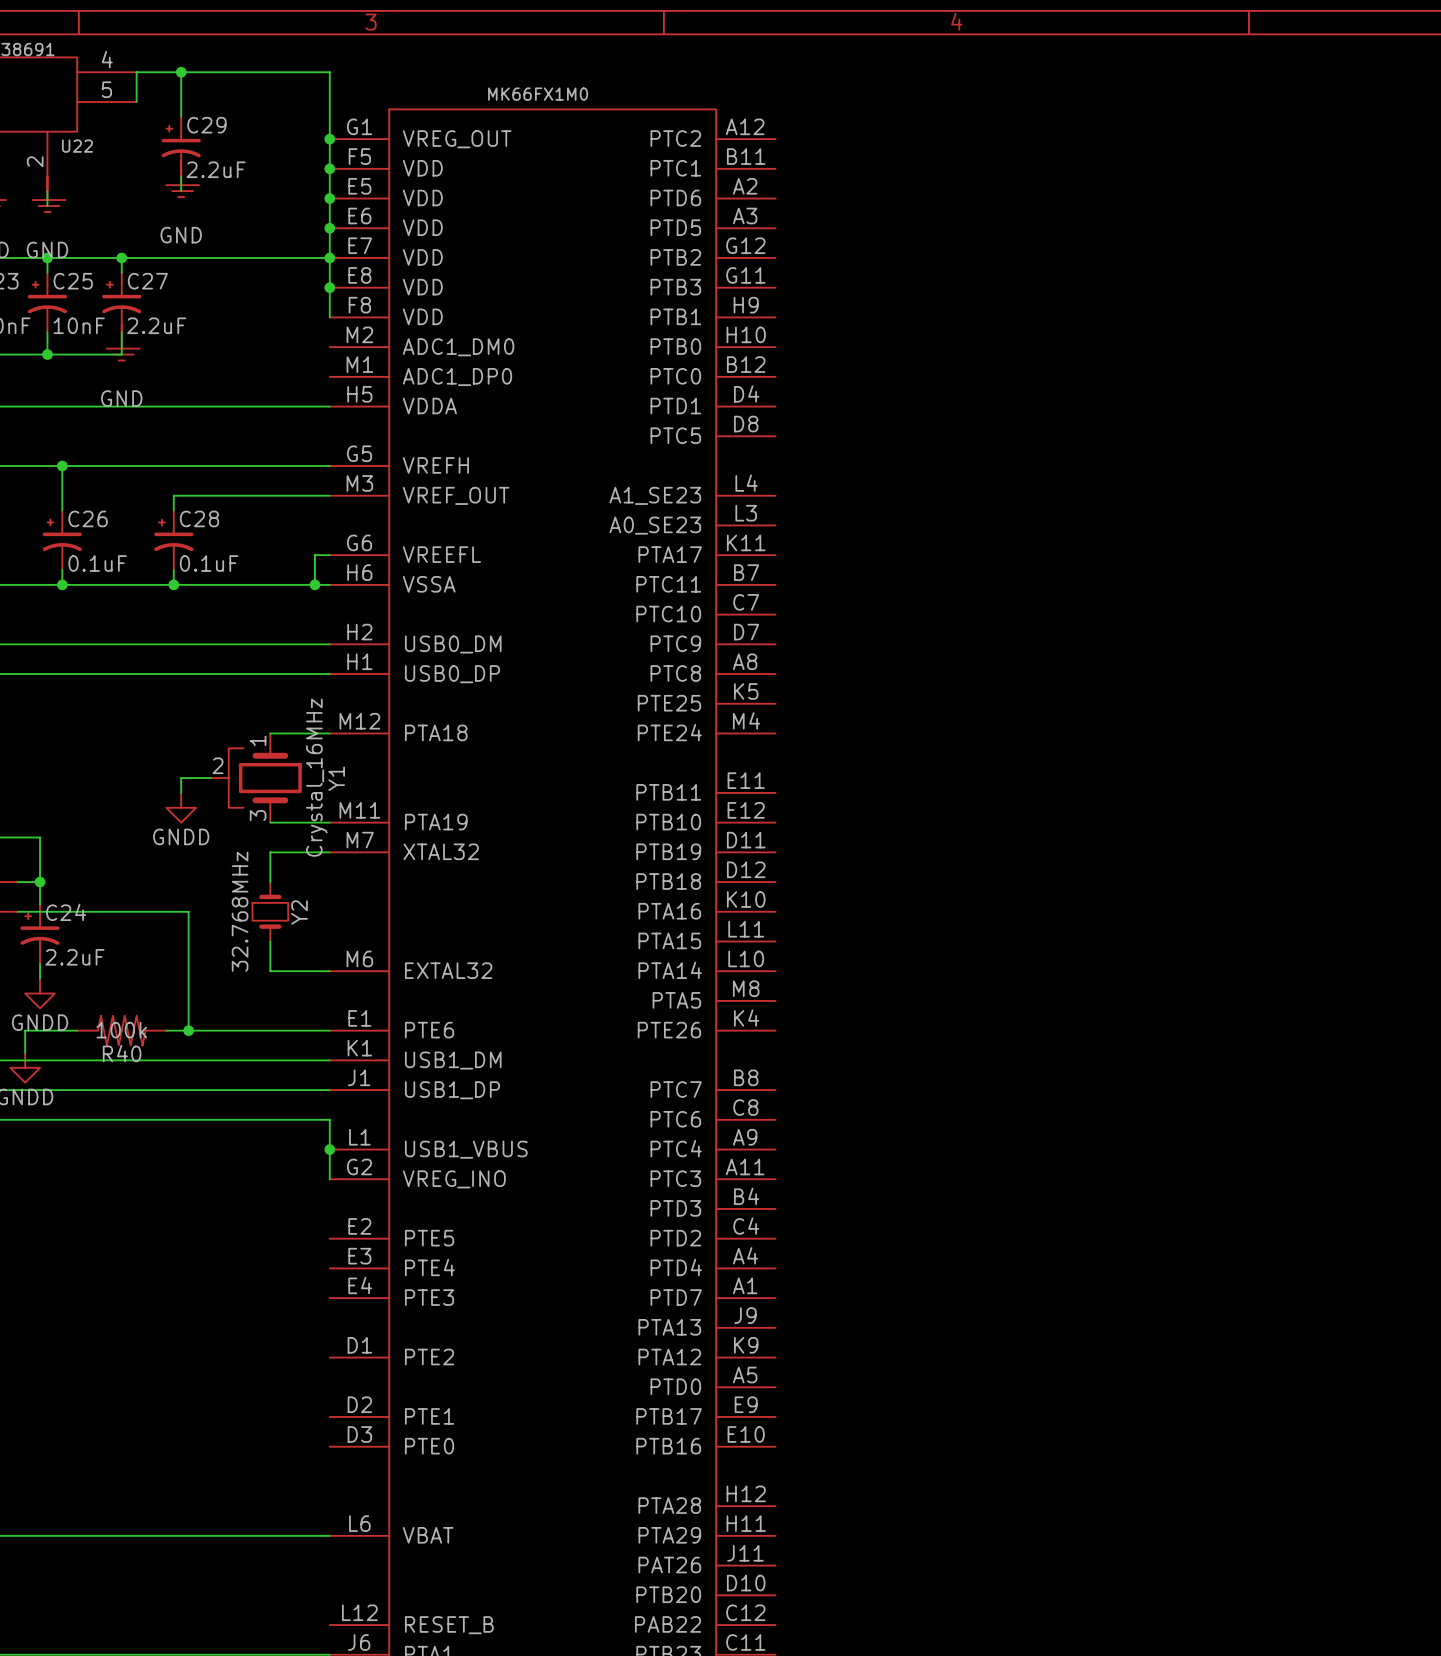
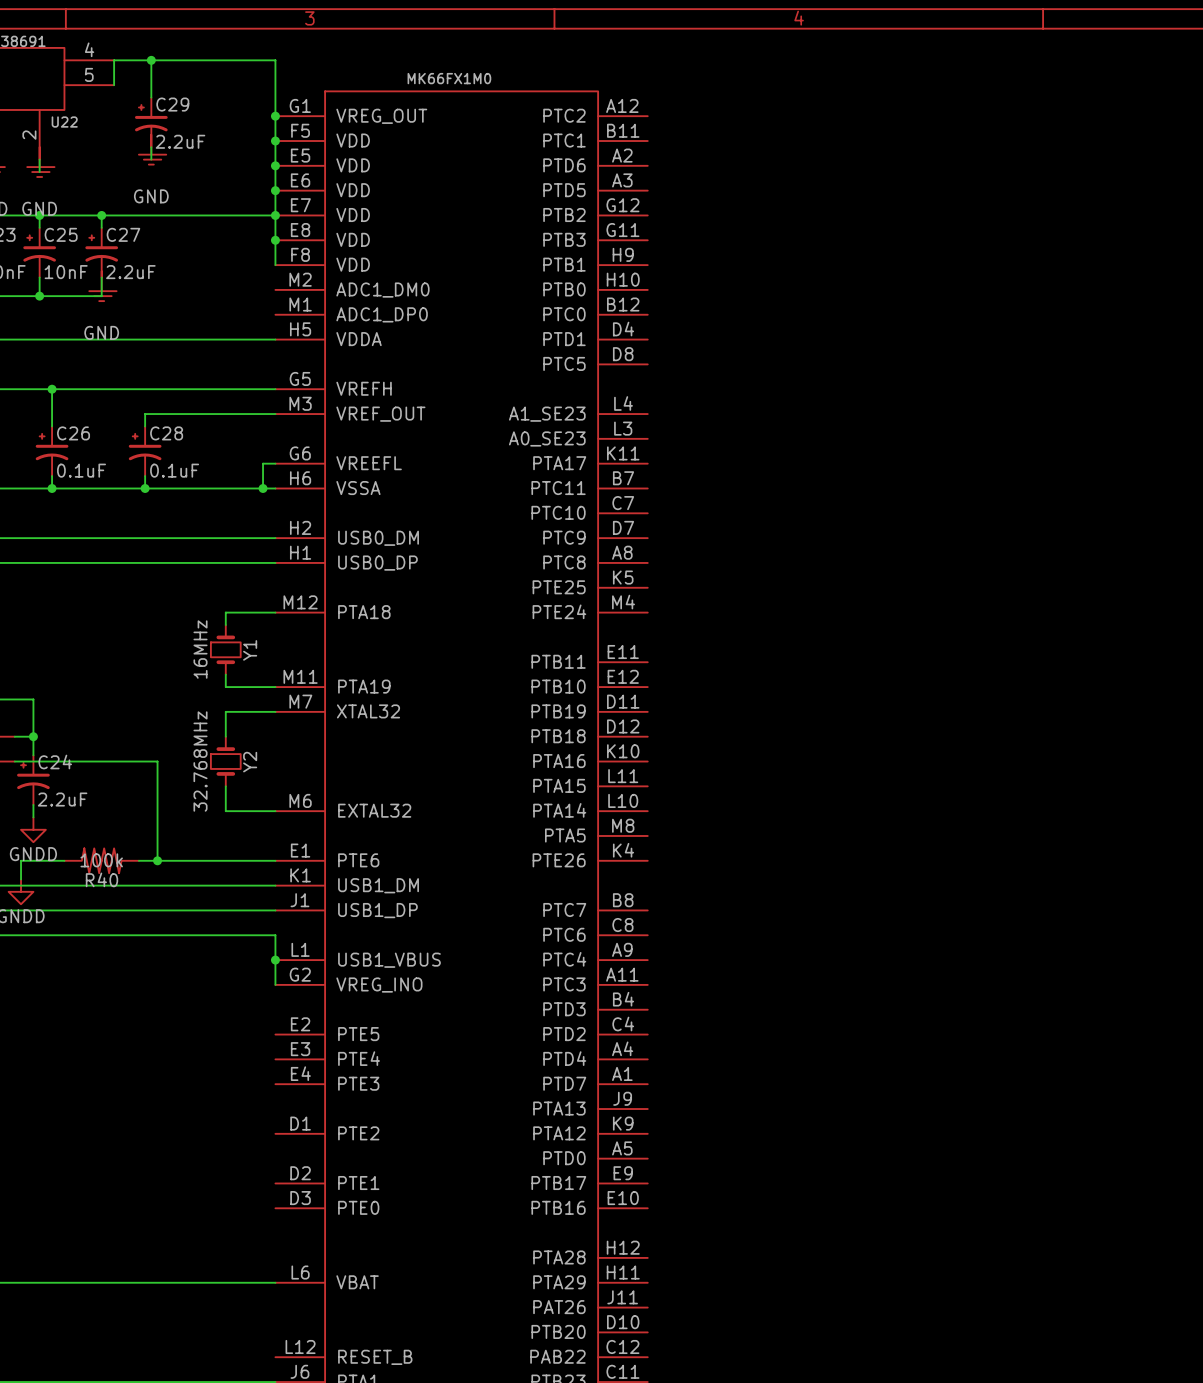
Y1 symbol: [210, 733, 302, 823] -> [210, 625, 241, 675]
Y1 value: Crystal_16MHz (316, 777) -> 16MHz (200, 649)
wire: (210, 778) (181, 778) (181, 792) -> none
Y1 name position: Y1 (336, 778) -> Y1 (250, 650)
power symbol: GNDD (181, 807) -> none

